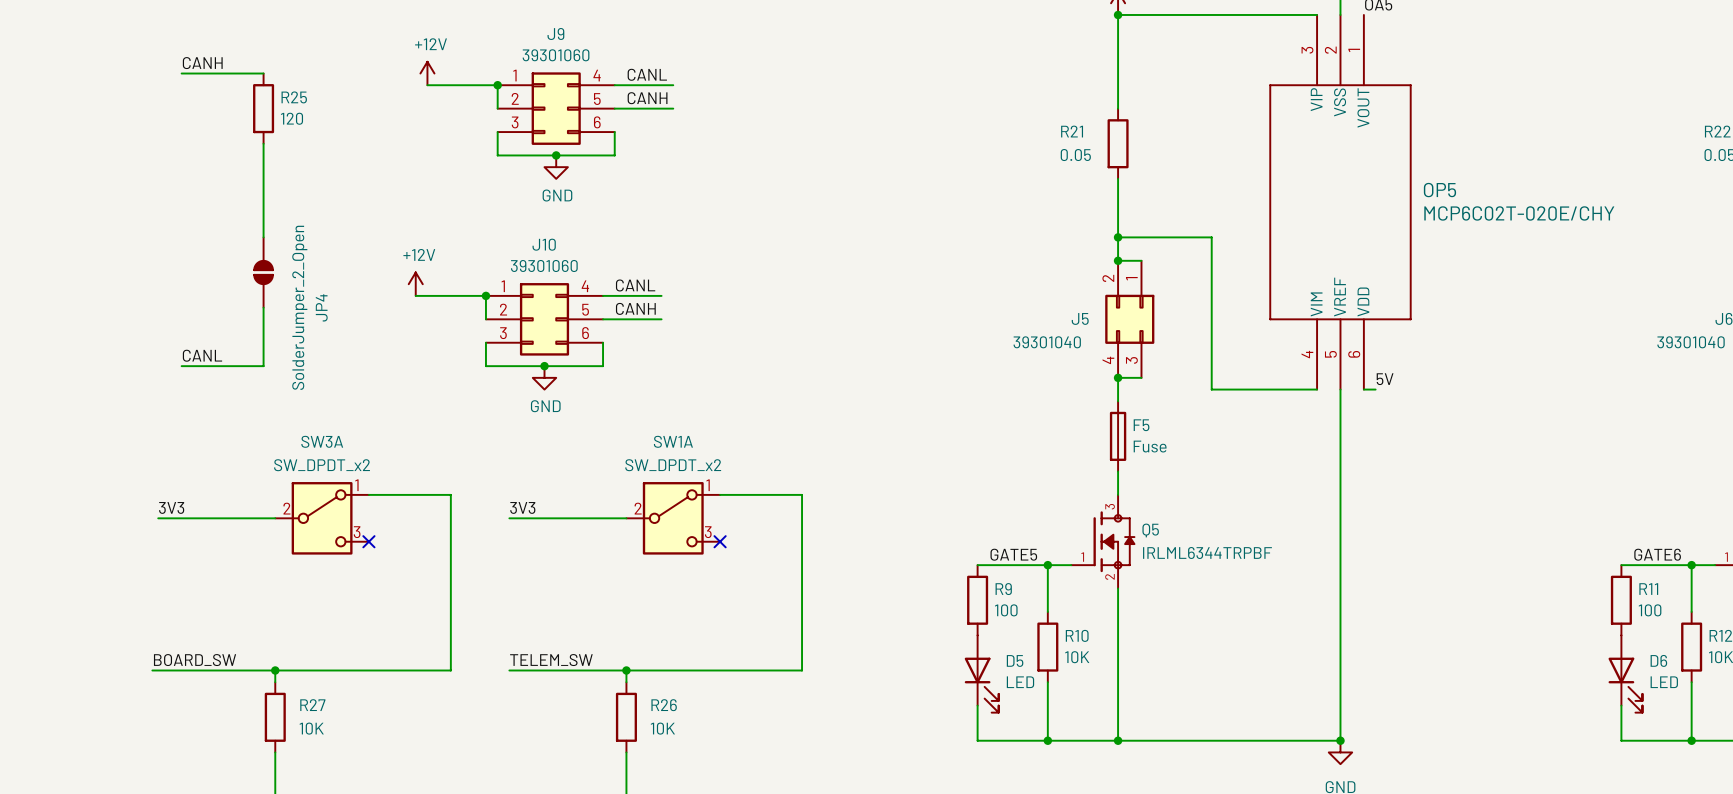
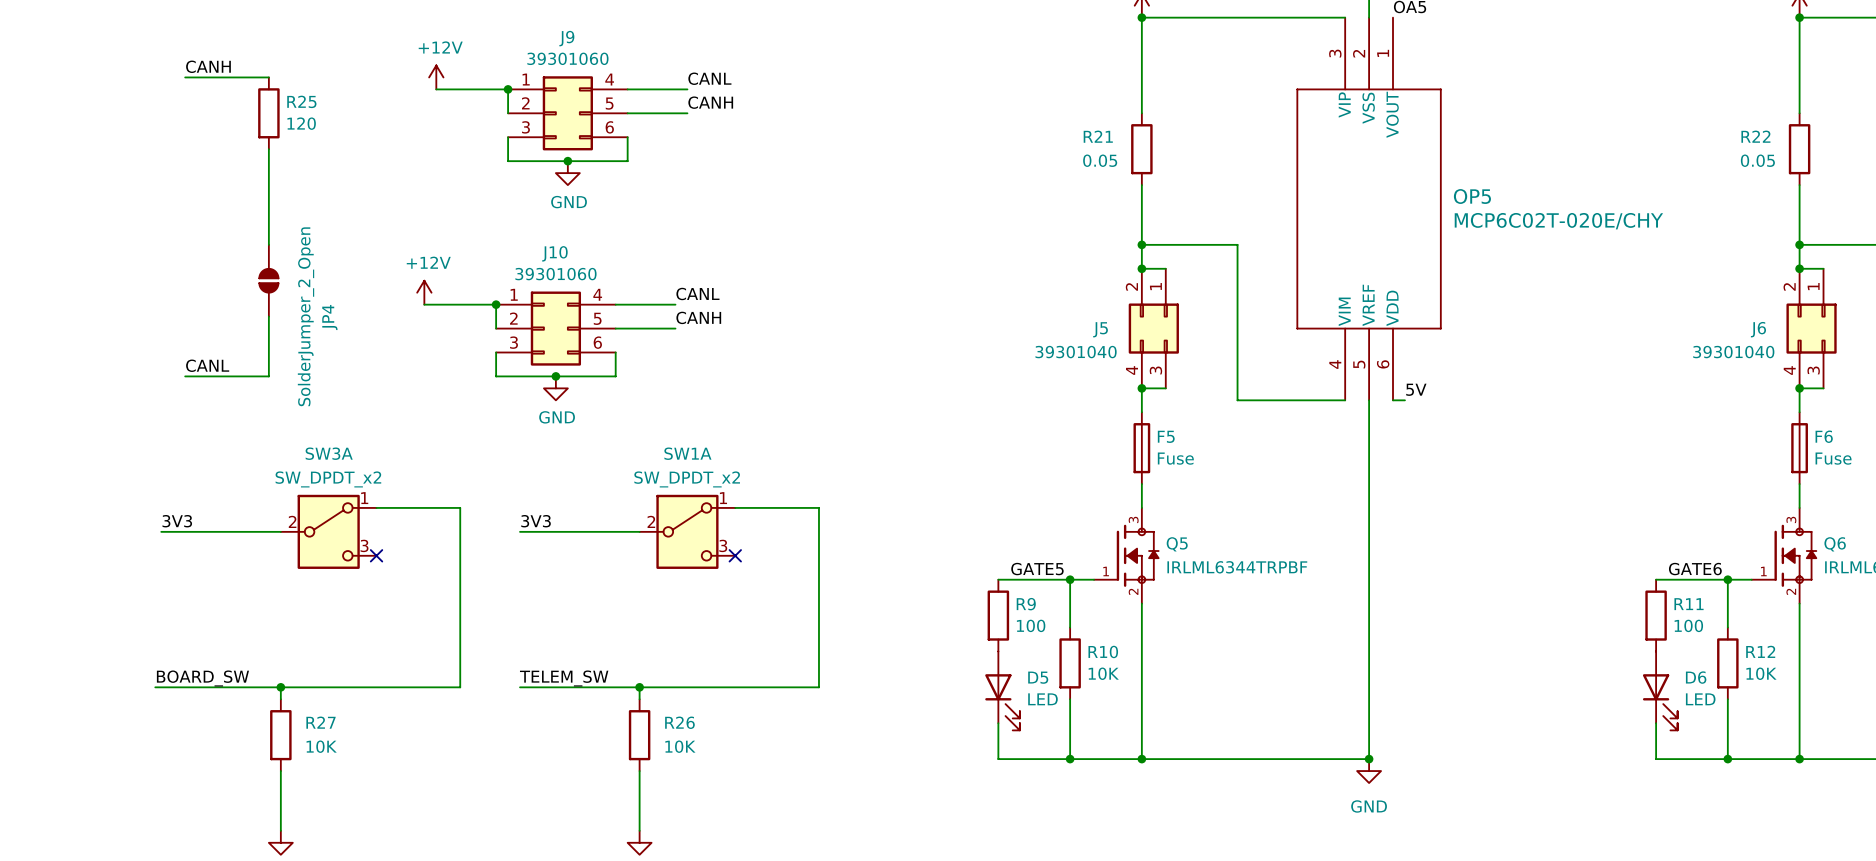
label position: CANL (647, 74) -> CANL (709, 78)
label position: CANH (647, 98) -> CANH (710, 102)
label position: CANL (635, 285) -> CANL (697, 294)
label position: CANH (635, 308) -> CANH (698, 317)

